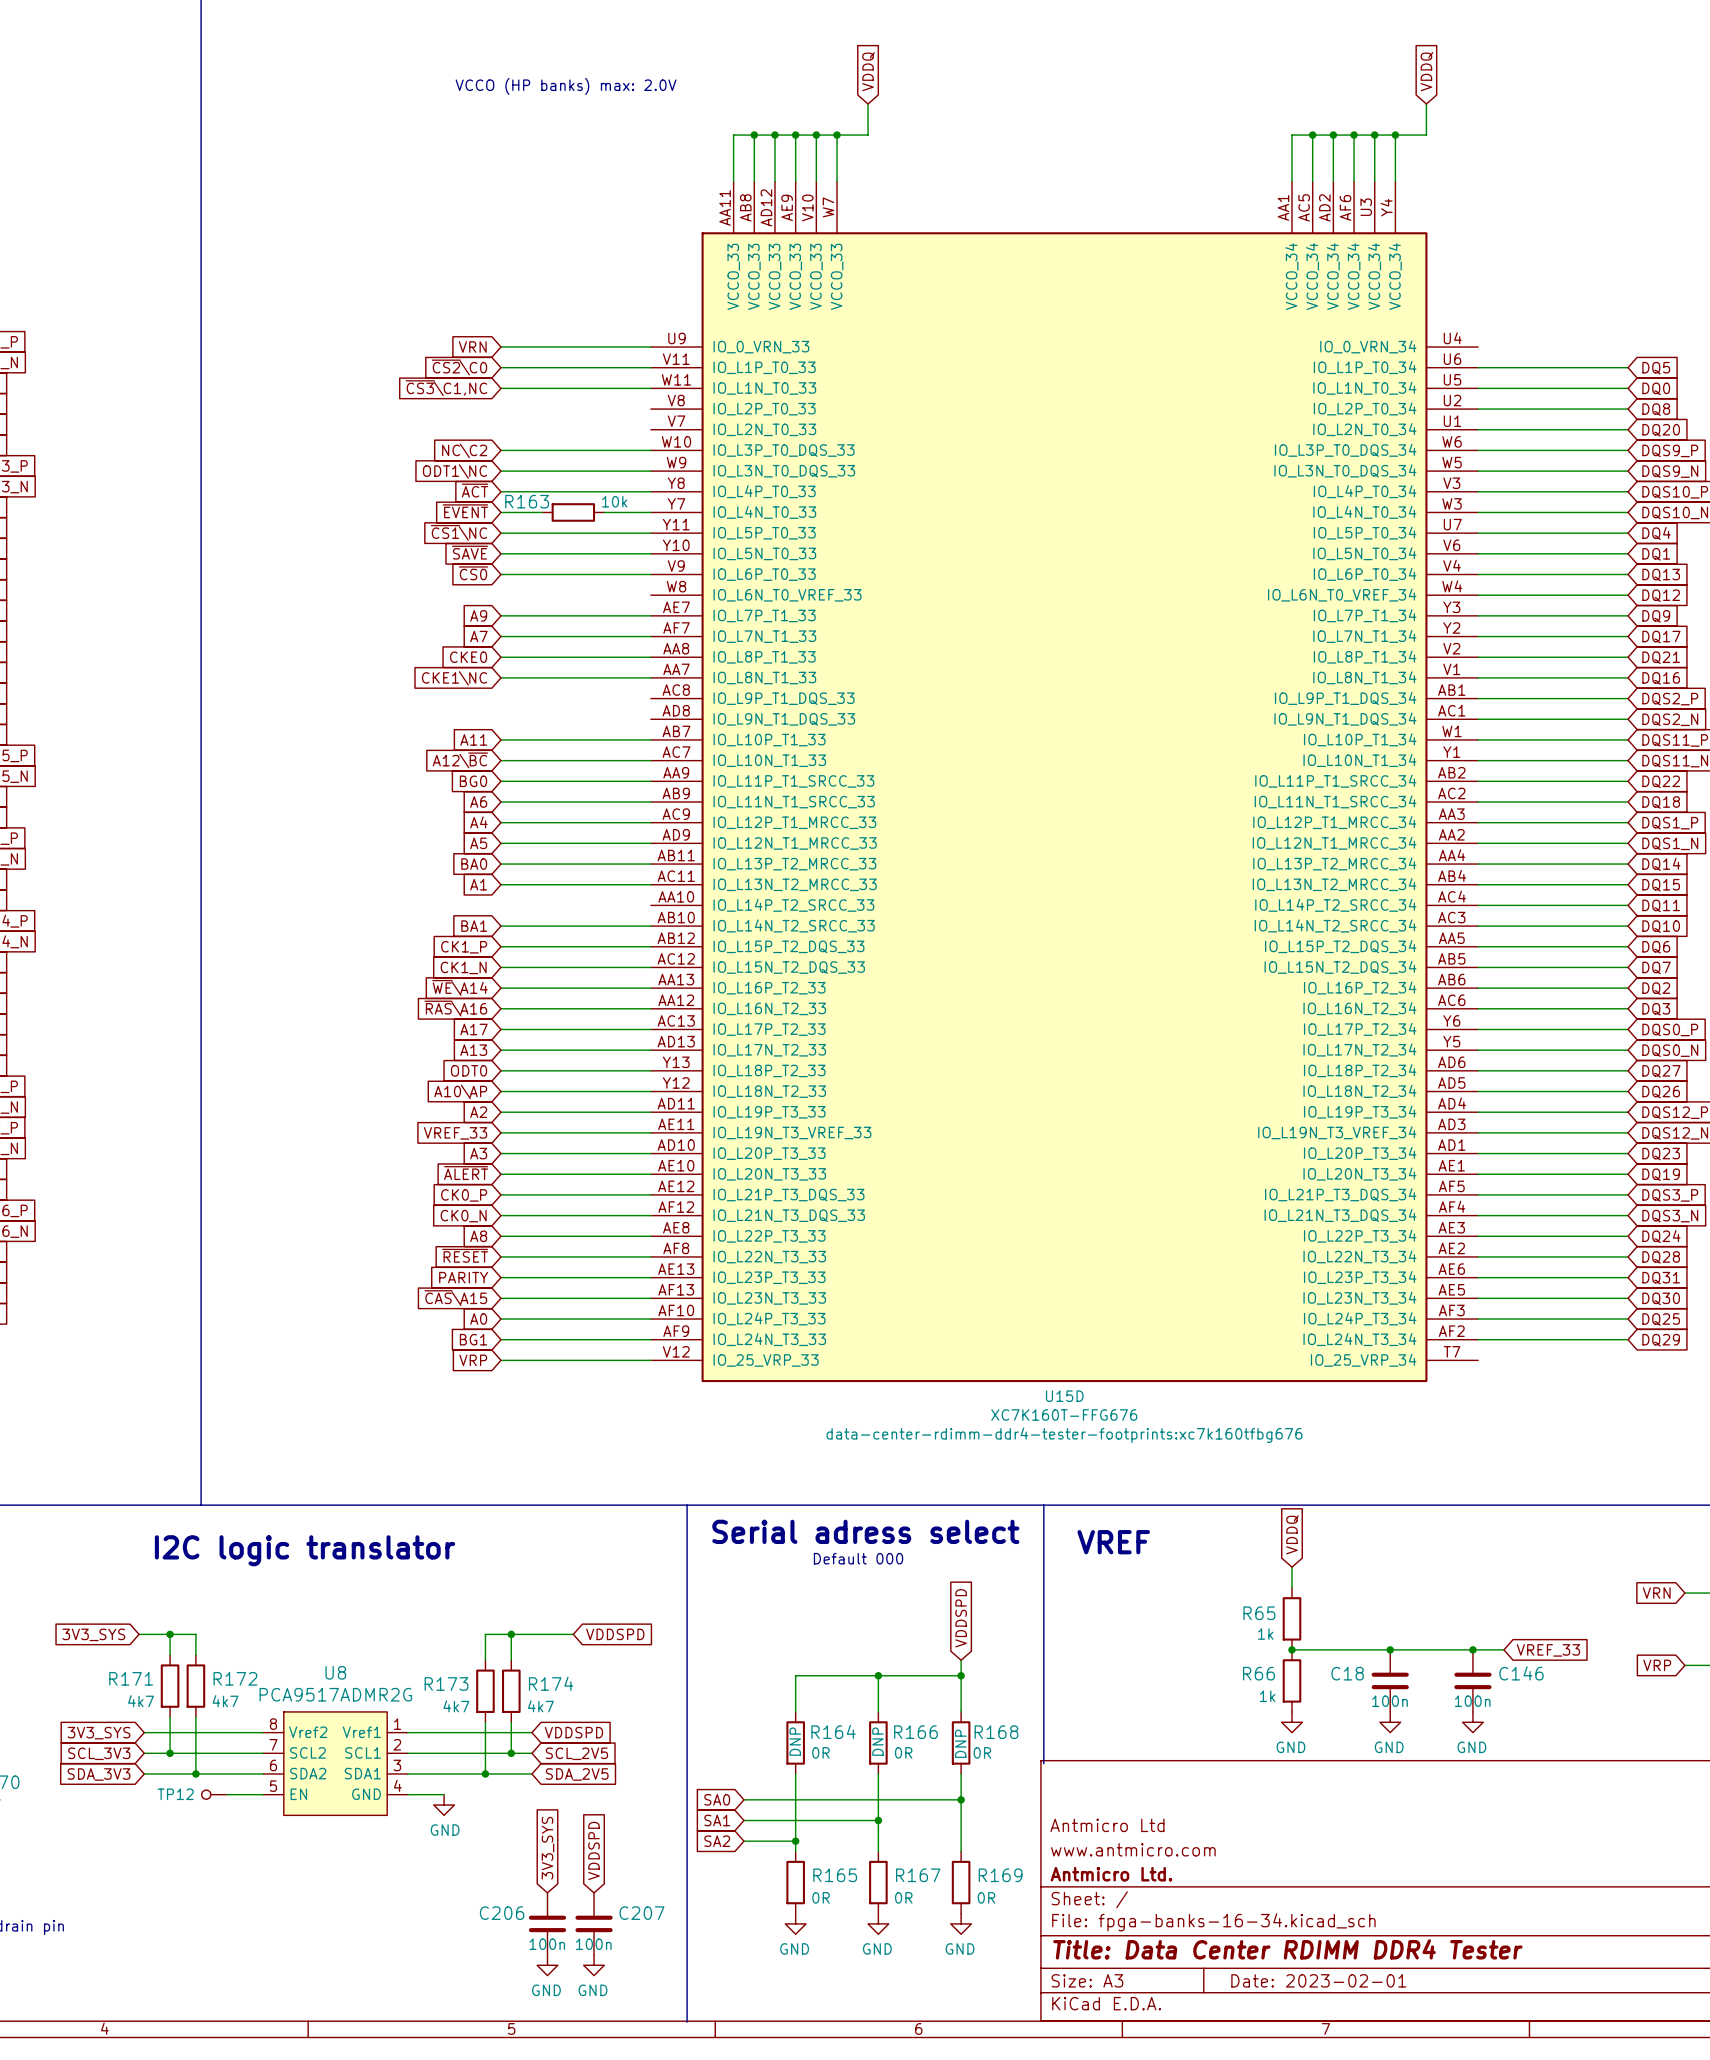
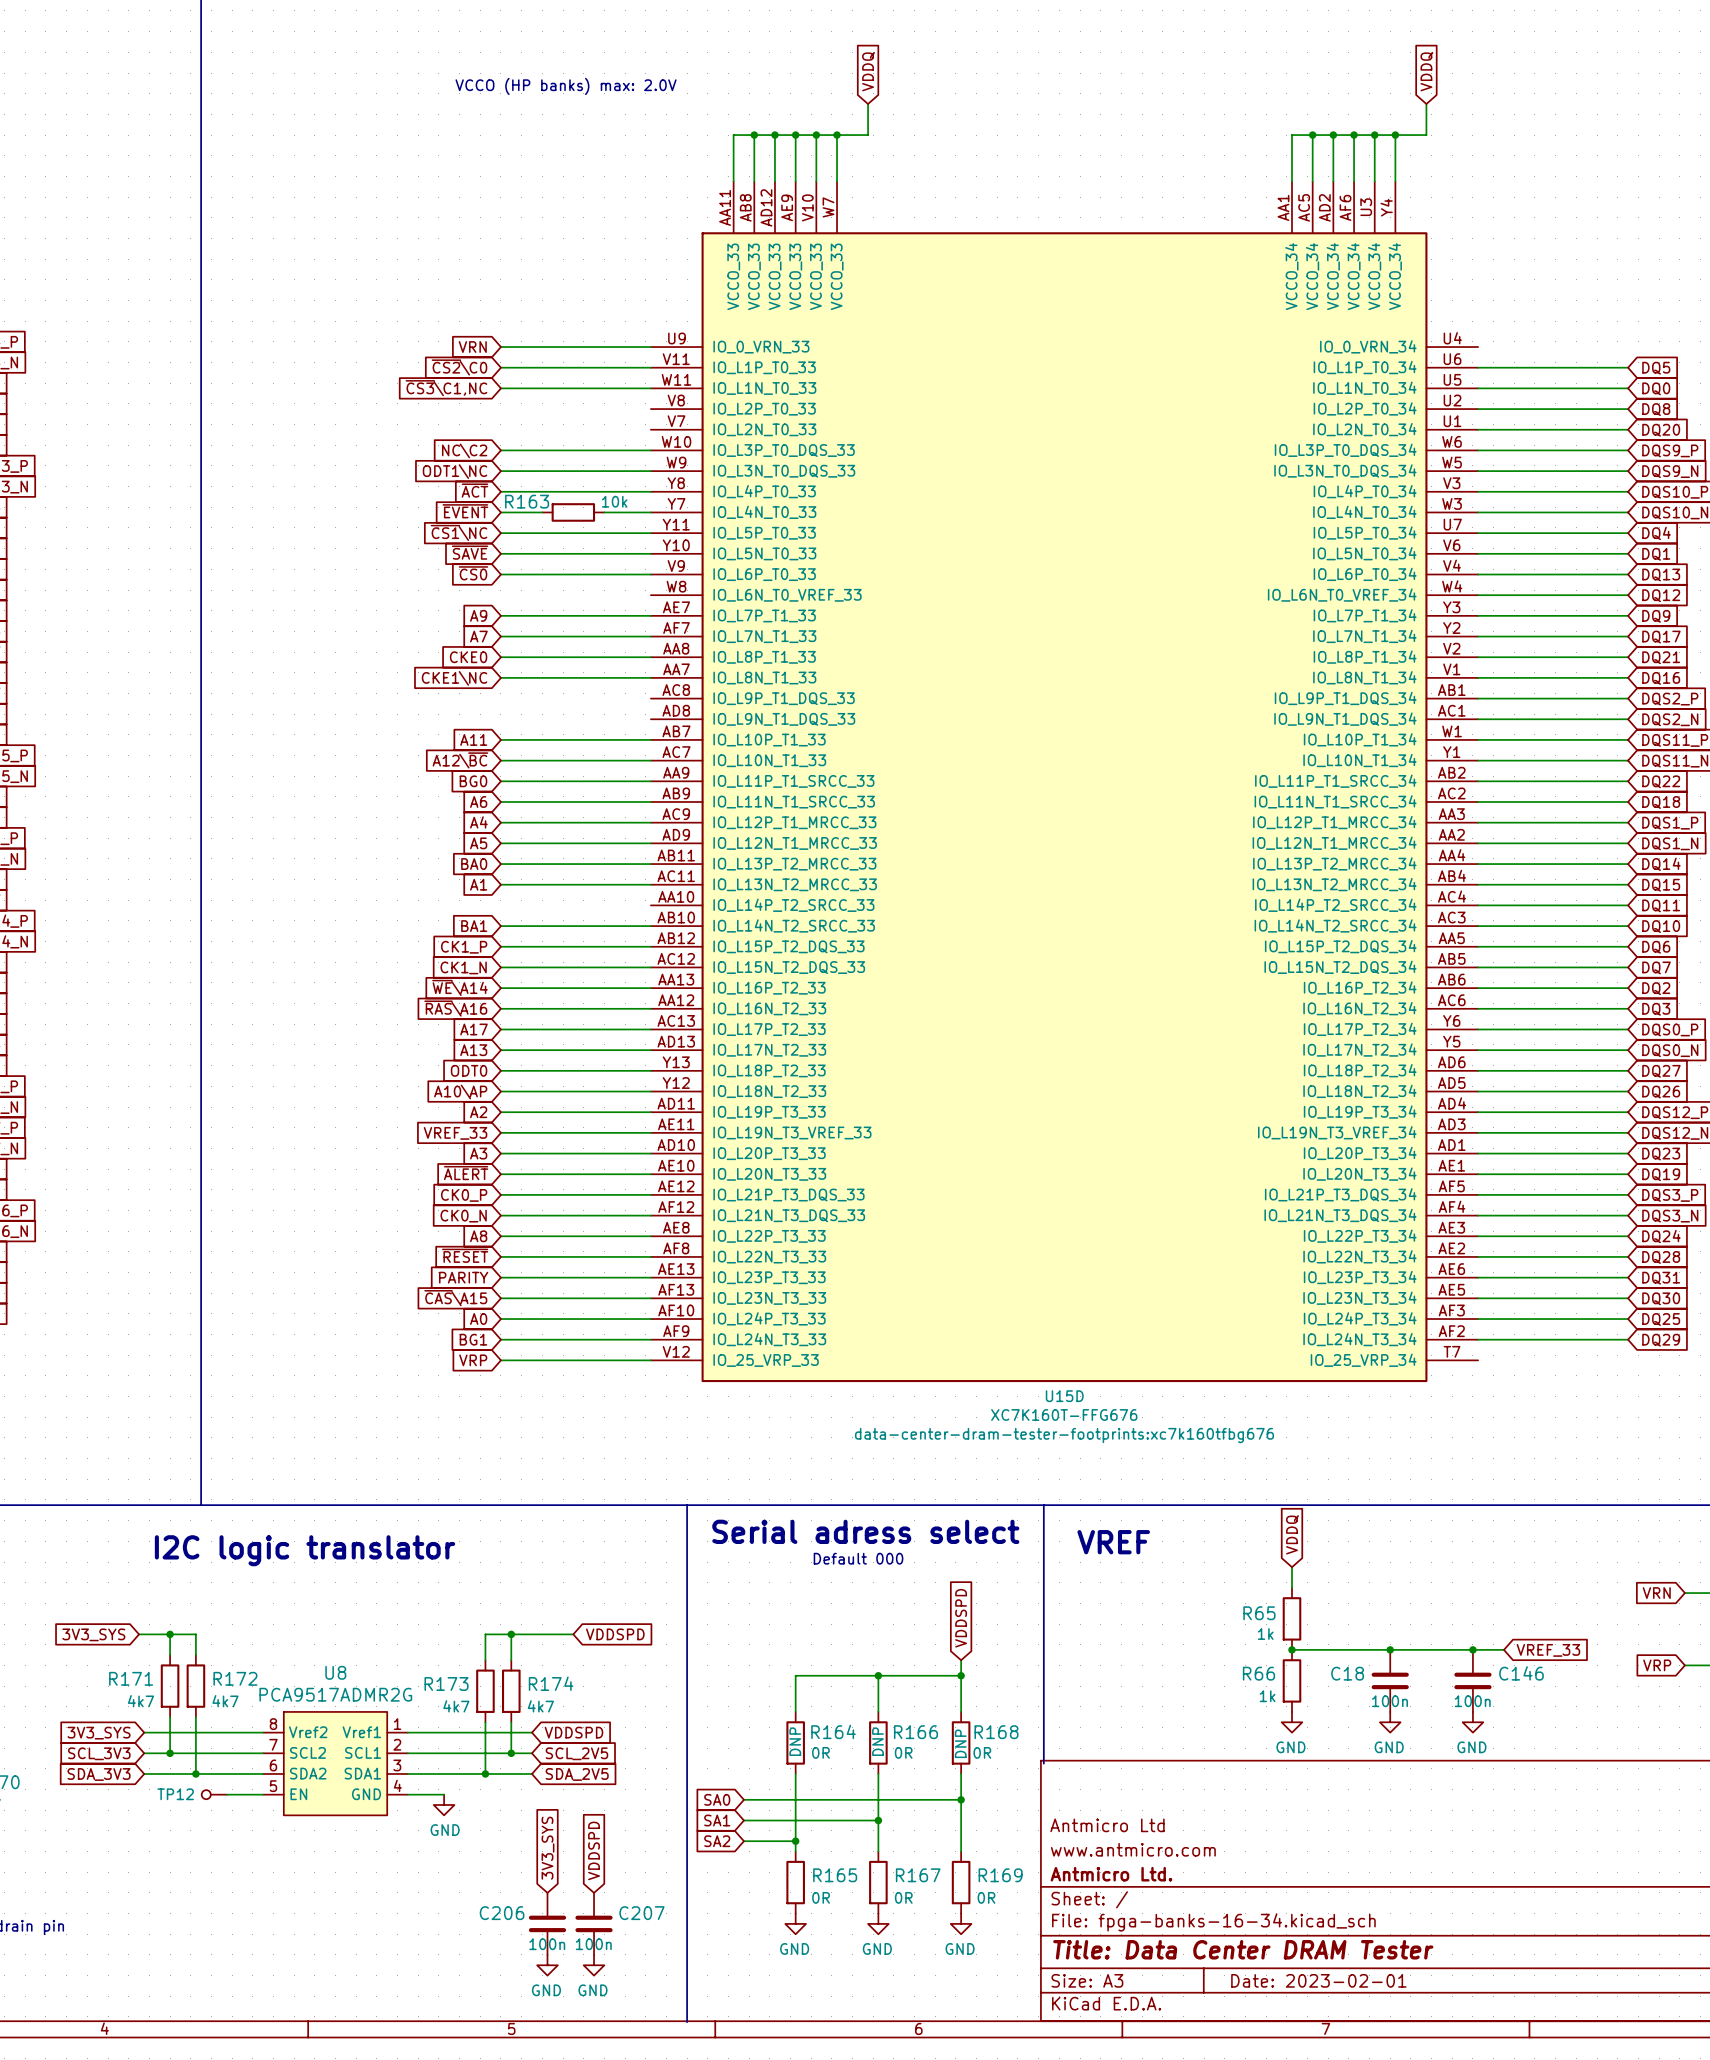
U15D text: data-center-rdimm-ddr4-tester-footprints:xc7k160tfbg676 (1064, 1435) -> data-center-dram-tester-footprints:xc7k160tfbg676 (1064, 1435)
title block: Title: Data Center RDIMM DDR4 Tester (1287, 1949) -> Title: Data Center DRAM Tester (1243, 1949)

